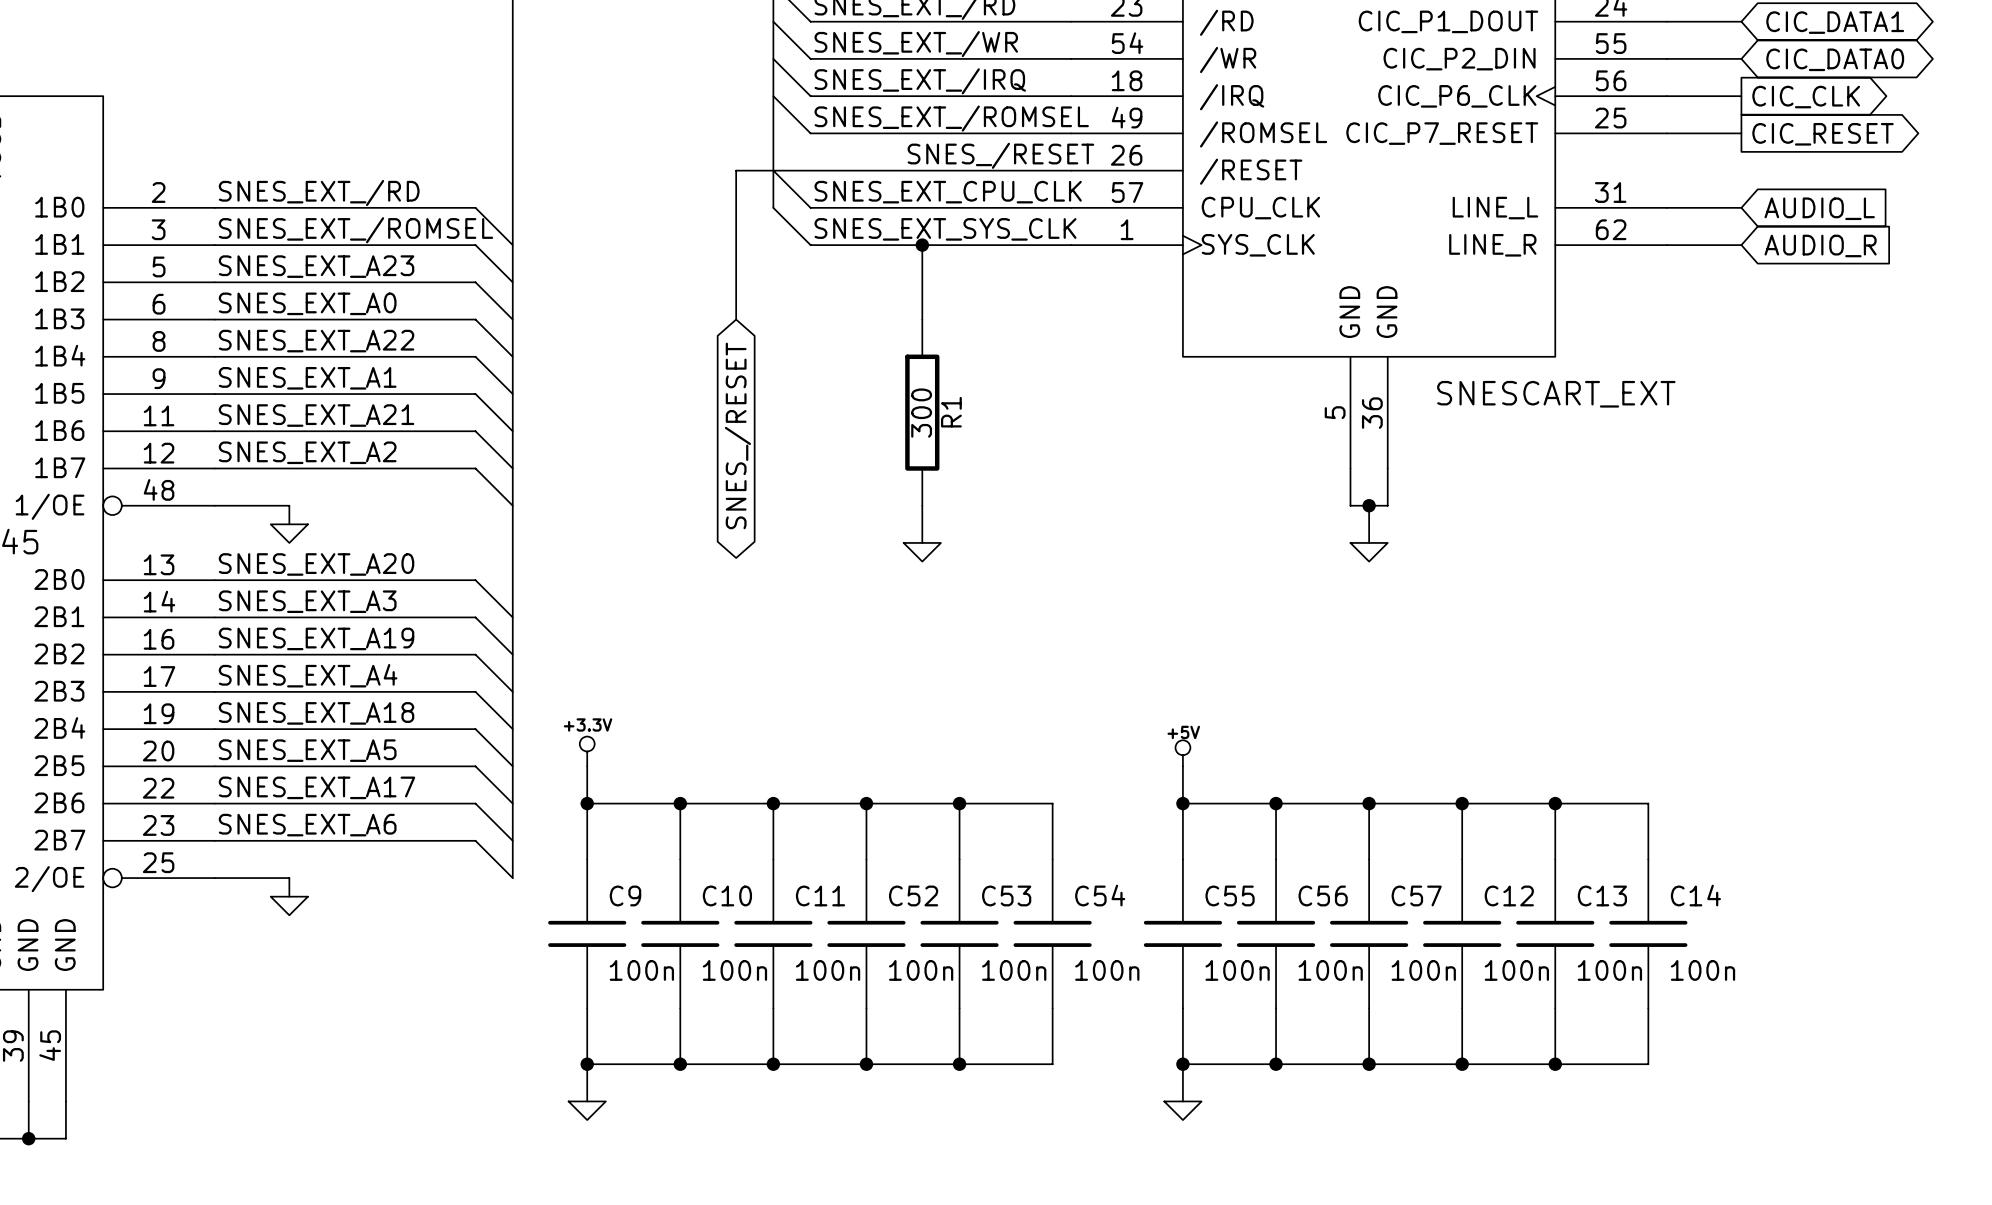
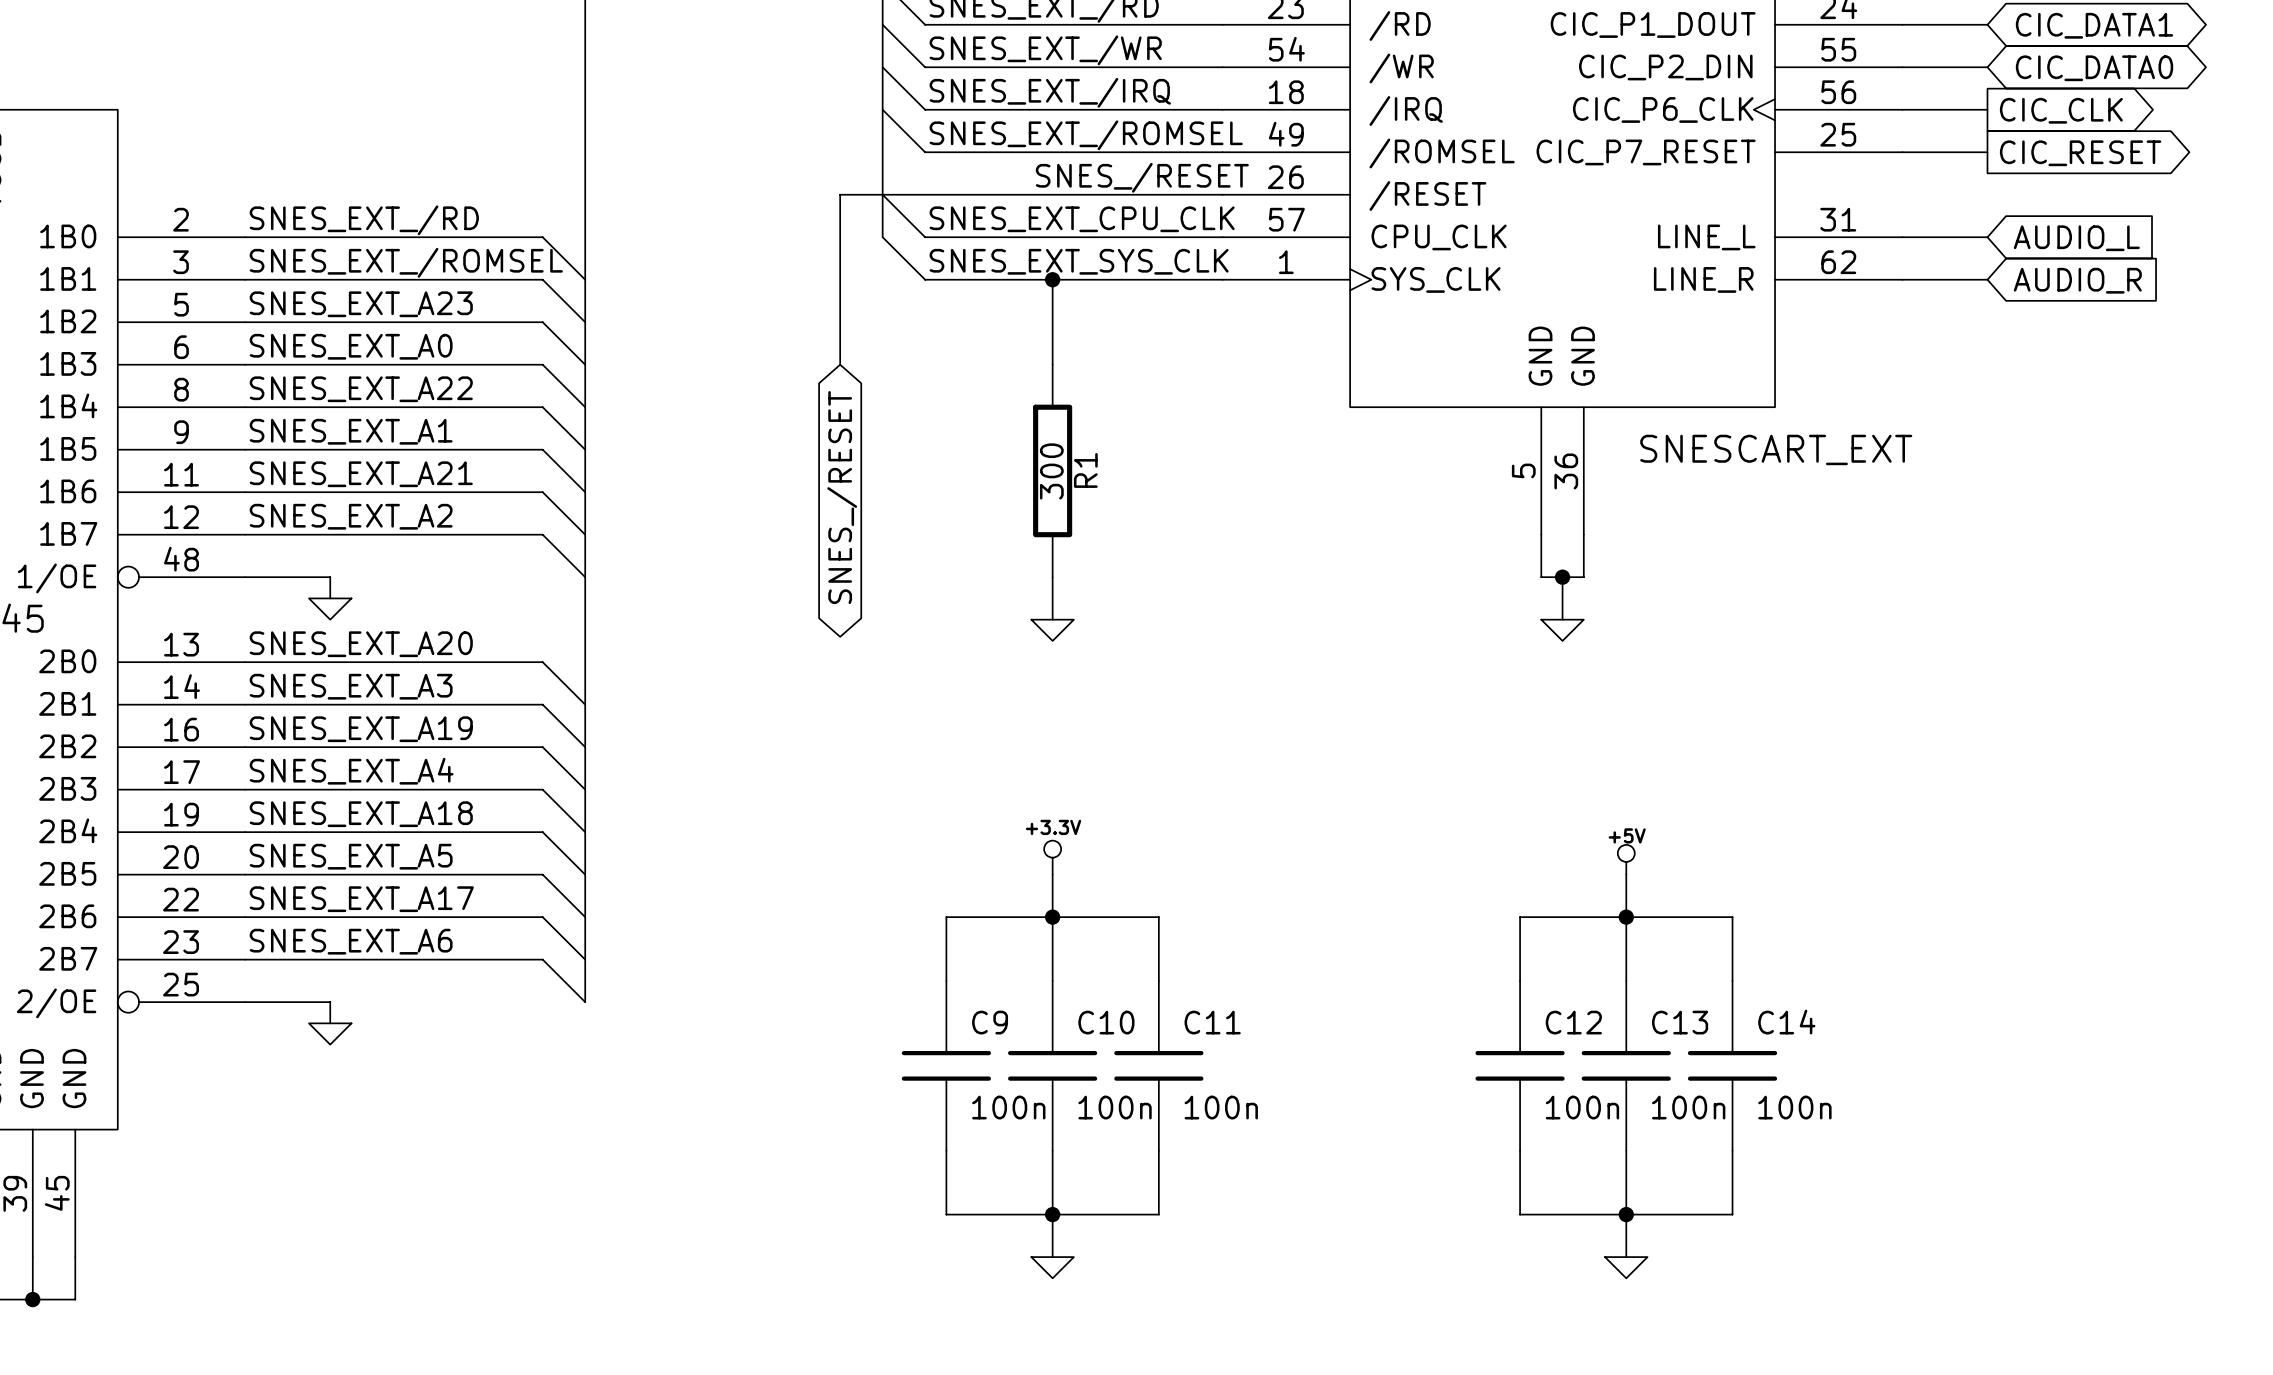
power symbol position: +3.3V (587, 751) -> +3.3V (1052, 857)
power symbol position: +5V (1182, 753) -> +5V (1626, 859)
wire: (587, 766) (587, 859) -> (1052, 874) (1052, 980)
wire: (1182, 766) (1182, 859) -> (1626, 874) (1626, 980)
wire: (587, 803) (829, 803) -> (946, 980) (946, 917)
junction: (587, 803) -> none
wire: (680, 803) (680, 859) -> none
junction: (680, 803) -> none
wire: (773, 803) (773, 859) -> none
junction: (773, 803) -> none
wire: (866, 803) (866, 859) -> none
junction: (866, 803) -> none
junction: none -> (1052, 917)
wire: (959, 803) (959, 859) -> none
junction: (959, 803) -> none
wire: (1015, 803) (1052, 803) (1052, 859) -> (1158, 917) (1158, 980)
wire: (1182, 803) (1331, 803) -> (1520, 980) (1520, 917)
junction: (1182, 803) -> none
wire: (1276, 803) (1276, 859) -> none
junction: (1276, 803) -> none
wire: (1369, 803) (1369, 859) -> none
junction: (1369, 803) -> none
junction: none -> (1626, 917)
wire: (1462, 803) (1462, 859) -> none
junction: (1462, 803) -> none
wire: (1518, 803) (1648, 803) (1648, 859) -> (1732, 917) (1732, 980)
wire: (1555, 803) (1555, 859) -> none
junction: (1555, 803) -> none
C9 position: (587, 933) -> (946, 1065)
C10 position: (680, 933) -> (1052, 1065)
C11 position: (773, 933) -> (1158, 1065)
C52: 100n (866, 933) -> none
C53: 100n (959, 933) -> none
C54: 100n (1052, 933) -> none
C55: 100n (1182, 933) -> none
C56: 100n (1276, 933) -> none
C57: 100n (1369, 933) -> none
C12 position: (1462, 933) -> (1520, 1065)
C13 position: (1555, 933) -> (1626, 1065)
C14 position: (1648, 933) -> (1732, 1065)
wire: (587, 1008) (587, 1101) -> (1052, 1150) (1052, 1257)
wire: (680, 1008) (680, 1064) -> none
wire: (773, 1008) (773, 1064) -> none
wire: (866, 1008) (866, 1064) -> none
wire: (959, 1008) (959, 1064) -> none
wire: (1052, 1008) (1052, 1064) (1015, 1064) -> (1158, 1150) (1158, 1214)
wire: (1182, 1008) (1182, 1101) -> (1626, 1150) (1626, 1257)
wire: (1276, 1008) (1276, 1064) -> none
wire: (1369, 1008) (1369, 1064) -> none
wire: (1462, 1008) (1462, 1064) -> none
wire: (1555, 1008) (1555, 1064) -> none
wire: (1648, 1008) (1648, 1064) (1518, 1064) -> (1732, 1150) (1732, 1214)
wire: (587, 1064) (829, 1064) -> (946, 1150) (946, 1214)
junction: (587, 1064) -> none
junction: (680, 1064) -> none
junction: (773, 1064) -> none
junction: (866, 1064) -> none
junction: none -> (1052, 1214)
junction: (959, 1064) -> none
wire: (1182, 1064) (1331, 1064) -> (1520, 1150) (1520, 1214)
junction: (1182, 1064) -> none
junction: (1276, 1064) -> none
junction: (1369, 1064) -> none
junction: none -> (1626, 1214)
junction: (1462, 1064) -> none
junction: (1555, 1064) -> none
power symbol: (587, 1110) -> none
power symbol: none -> (1052, 1267)
power symbol: (1182, 1110) -> none
power symbol: none -> (1626, 1267)

